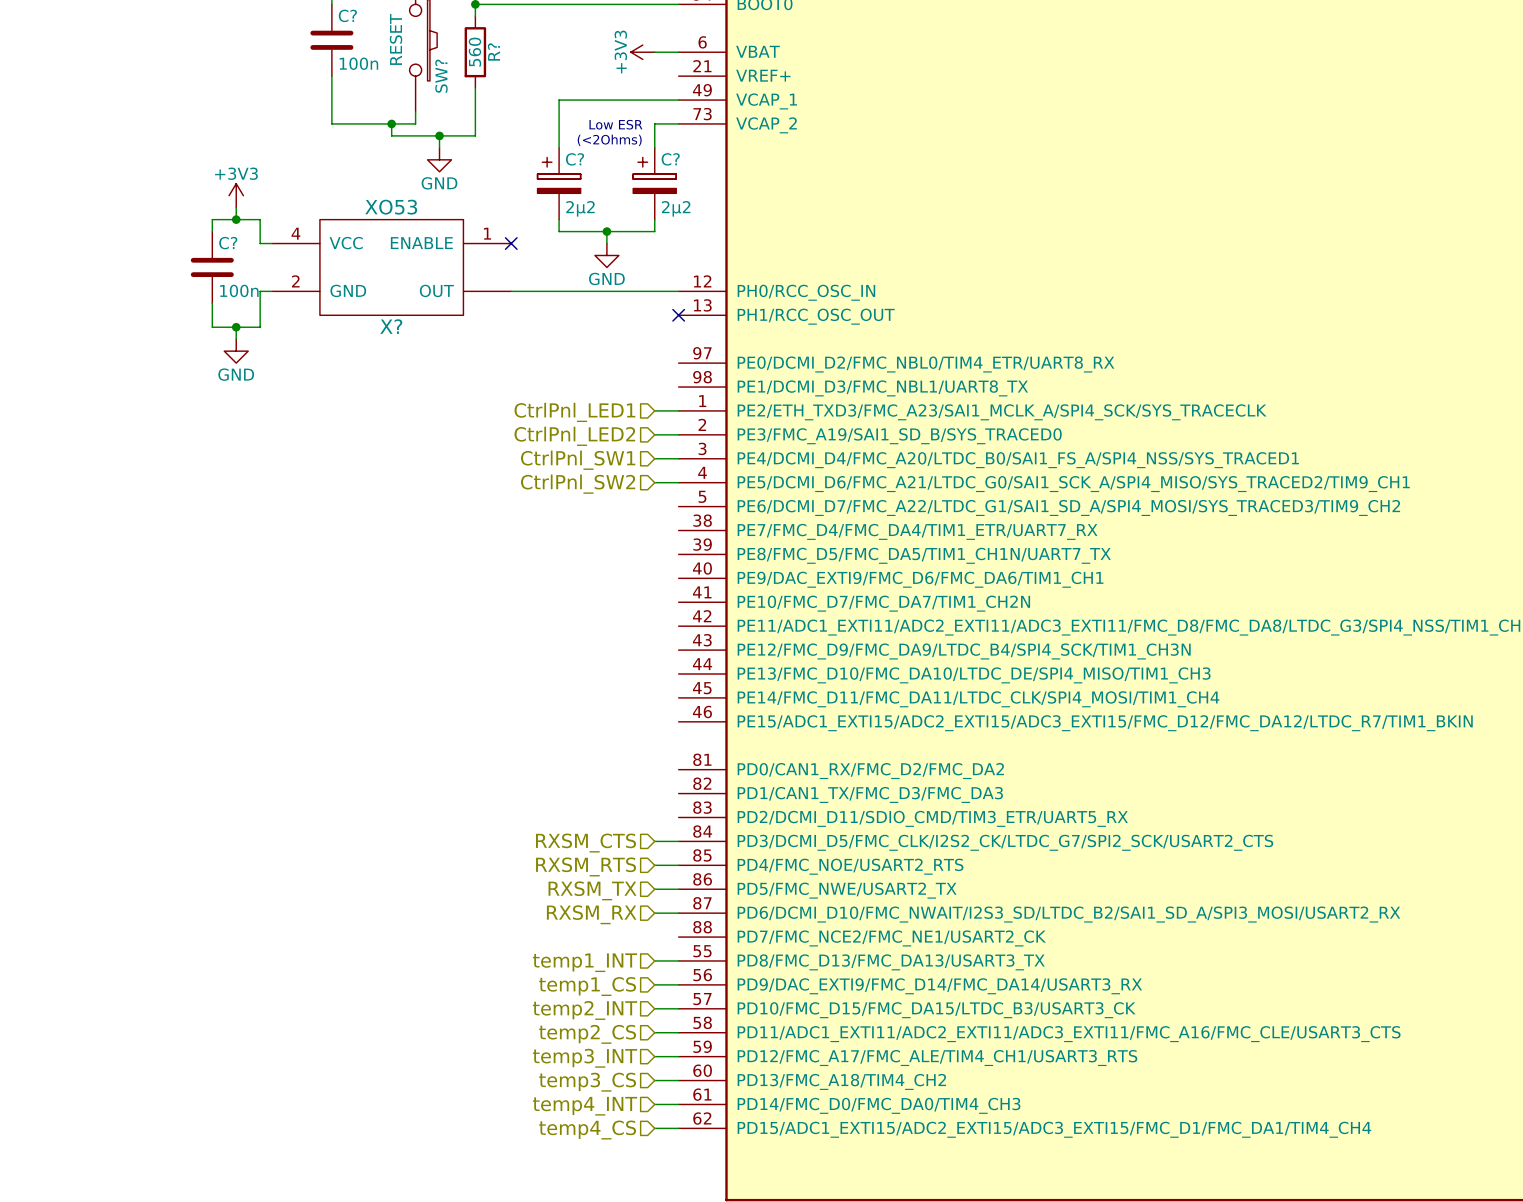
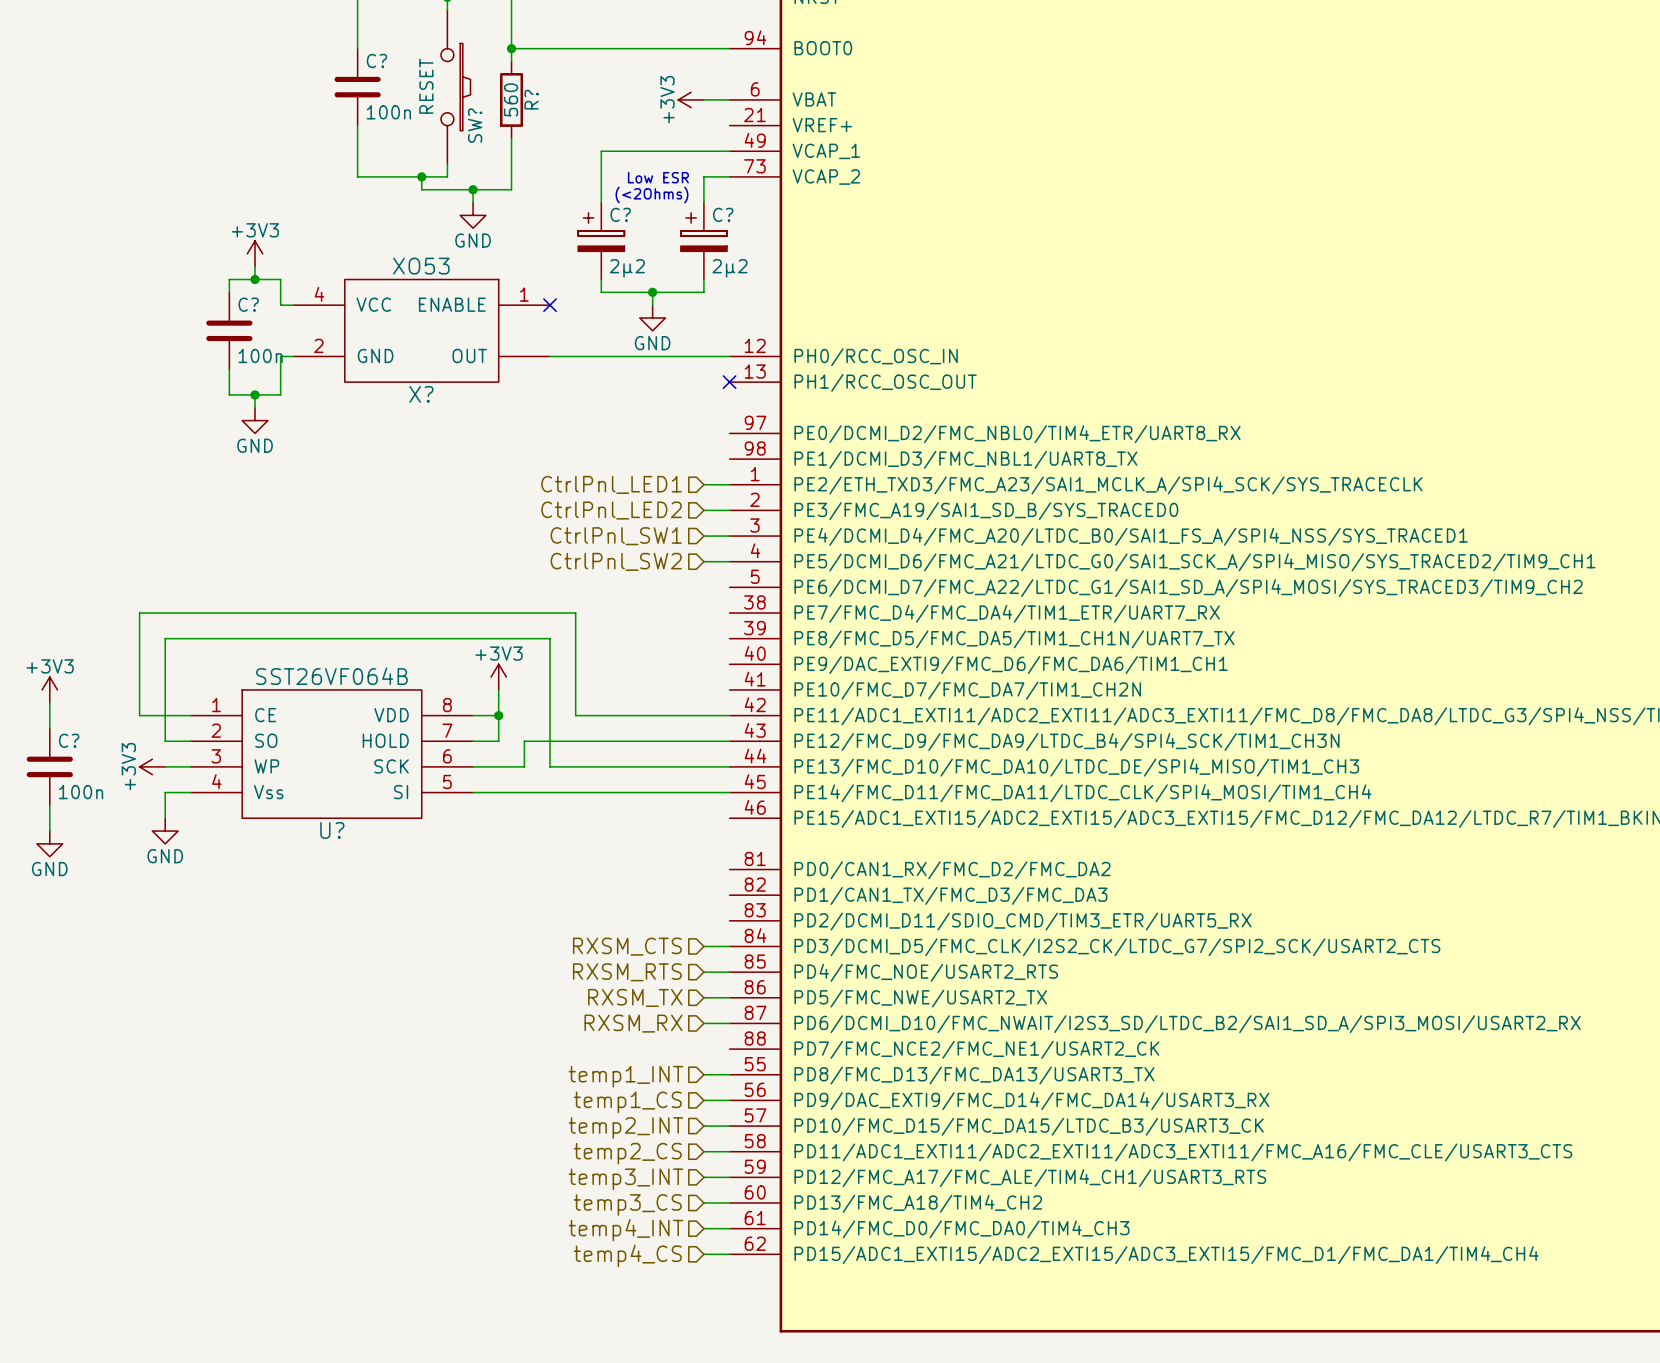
power symbol: none -> +3V3 (498, 677)
power symbol: none -> +3V3 (49, 689)
wire: none -> (498, 689) (498, 741) (473, 741)
wire: none -> (49, 702) (49, 728)
wire: none -> (190, 715) (139, 715) (139, 613) (575, 613) (575, 715) (729, 715)
wire: none -> (473, 715) (498, 715)
junction: none -> (498, 715)
wire: none -> (190, 741) (165, 741) (165, 638) (550, 638) (550, 766) (729, 766)
wire: none -> (729, 741) (524, 741) (524, 766) (473, 766)
U?: none -> SST26VF064B (331, 754)
C?: none -> 100n (49, 766)
power symbol: none -> +3V3 (152, 766)
wire: none -> (165, 766) (190, 766)
wire: none -> (190, 792) (165, 792) (165, 818)
wire: none -> (473, 792) (729, 792)
wire: none -> (49, 805) (49, 831)
power symbol: none -> GND (165, 831)
power symbol: none -> GND (49, 843)

